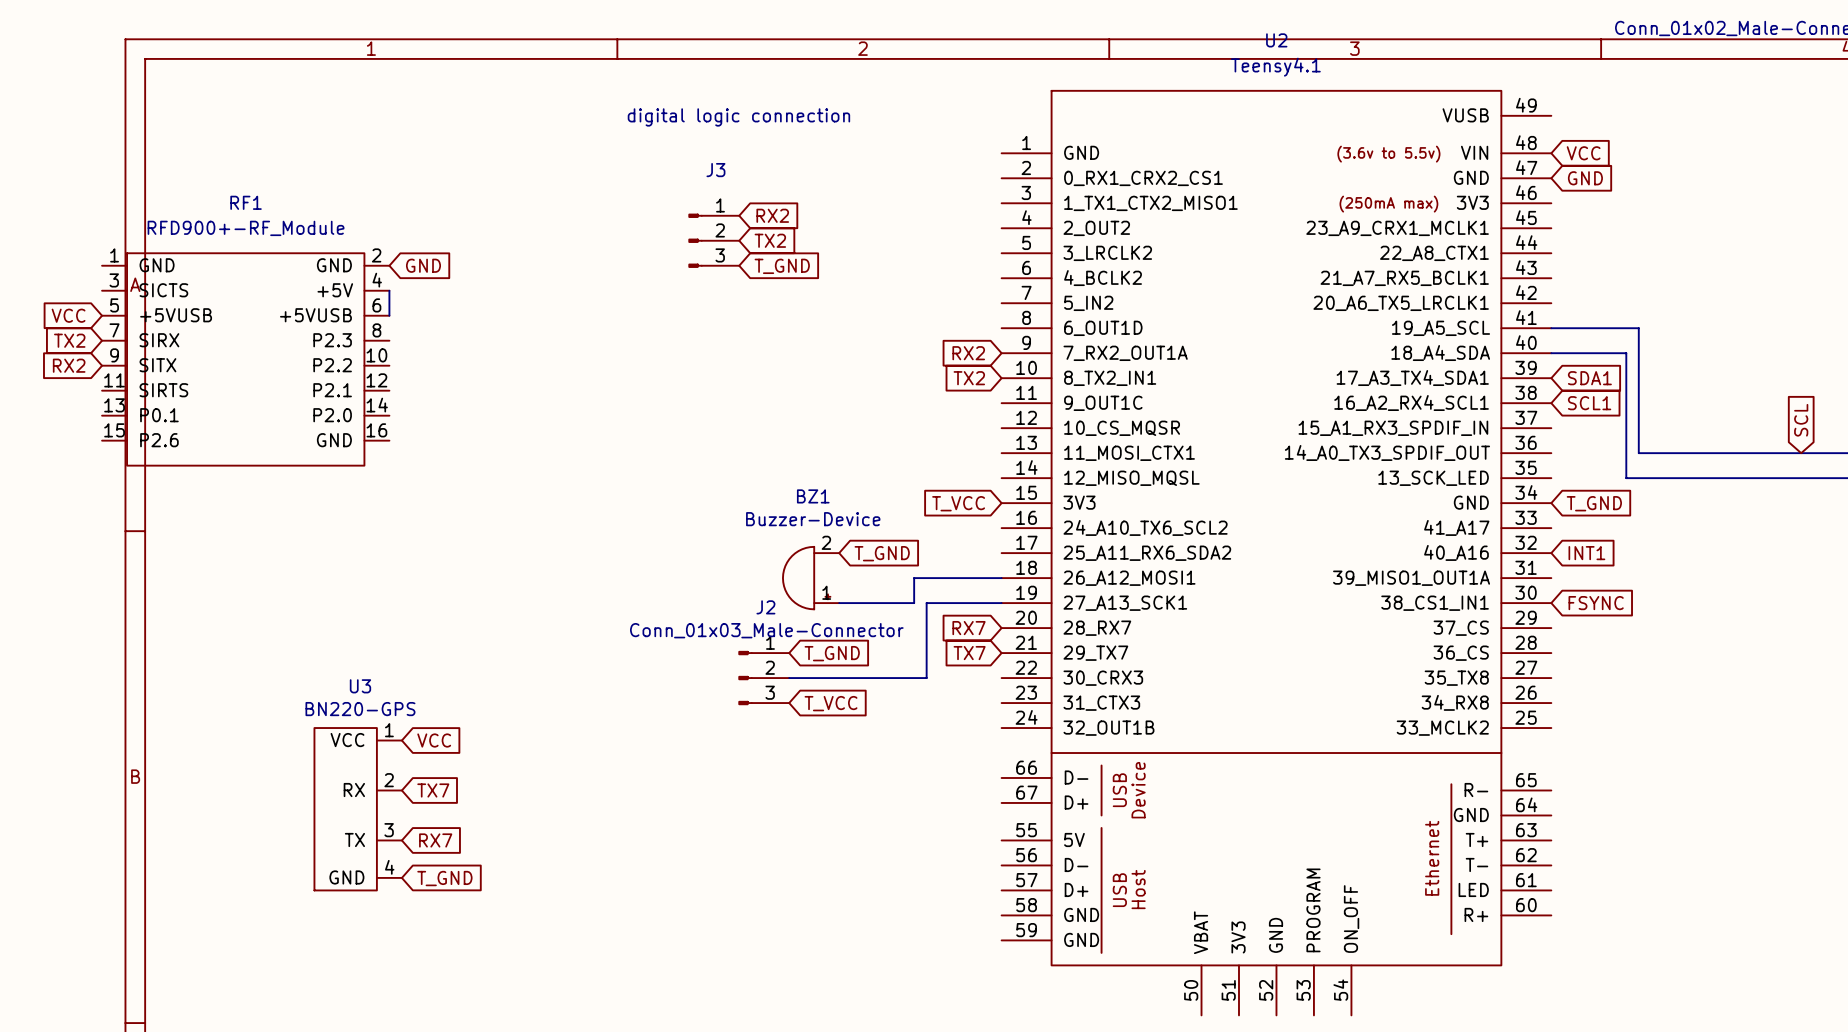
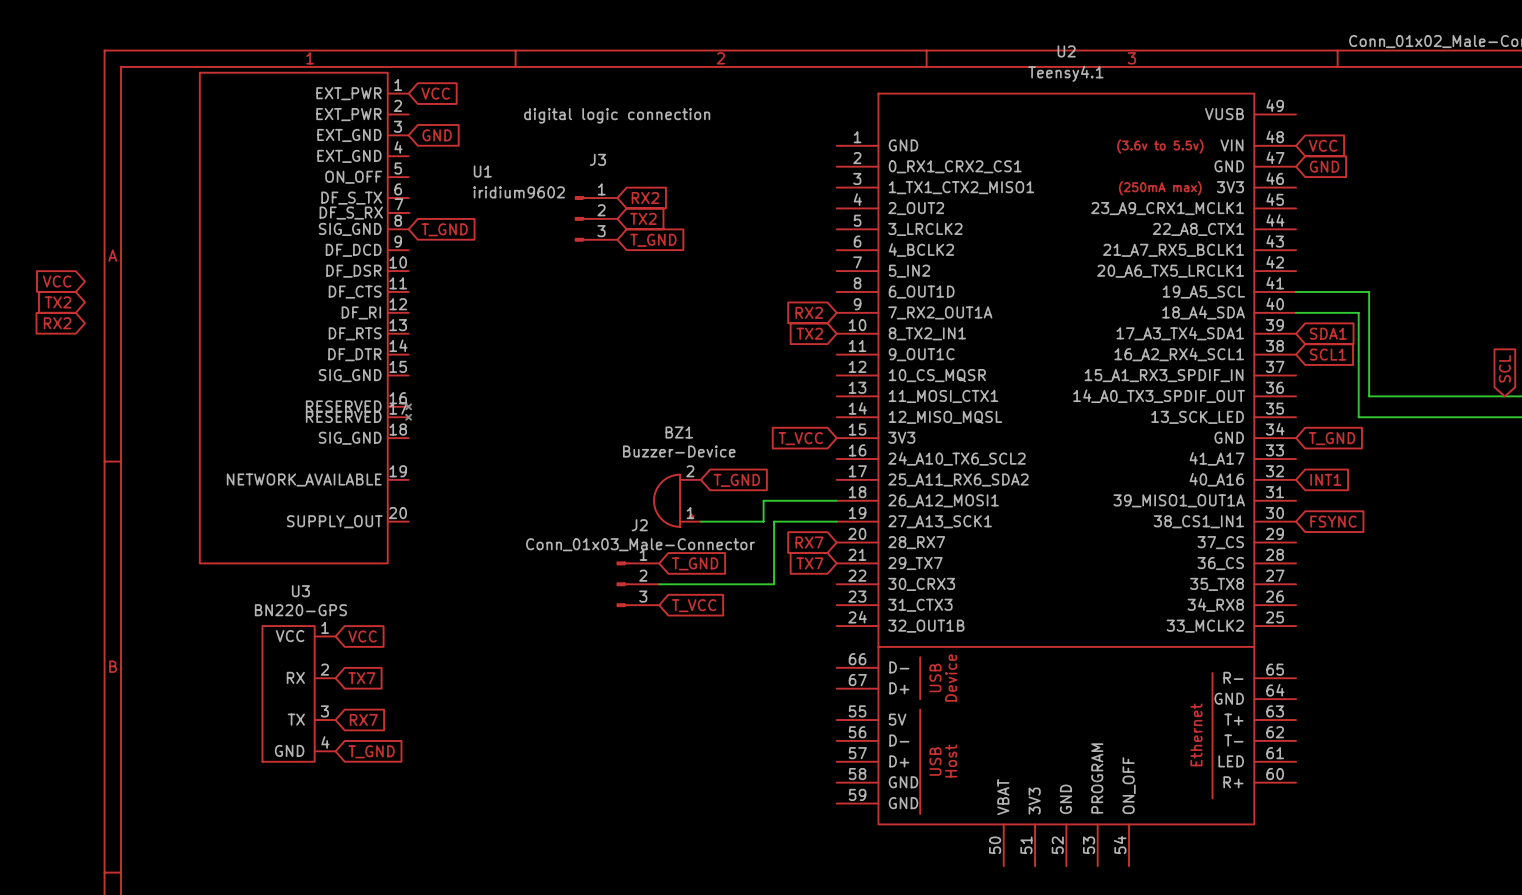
global label: none -> VCC (435, 93)
global label: none -> T_GND (444, 229)
global label position: GND (423, 265) -> GND (437, 135)
wire: (389, 290) (389, 315) -> none
RF1: RFD900+-RF_Module (245, 359) -> none
U1: none -> iridium9602 (330, 318)

